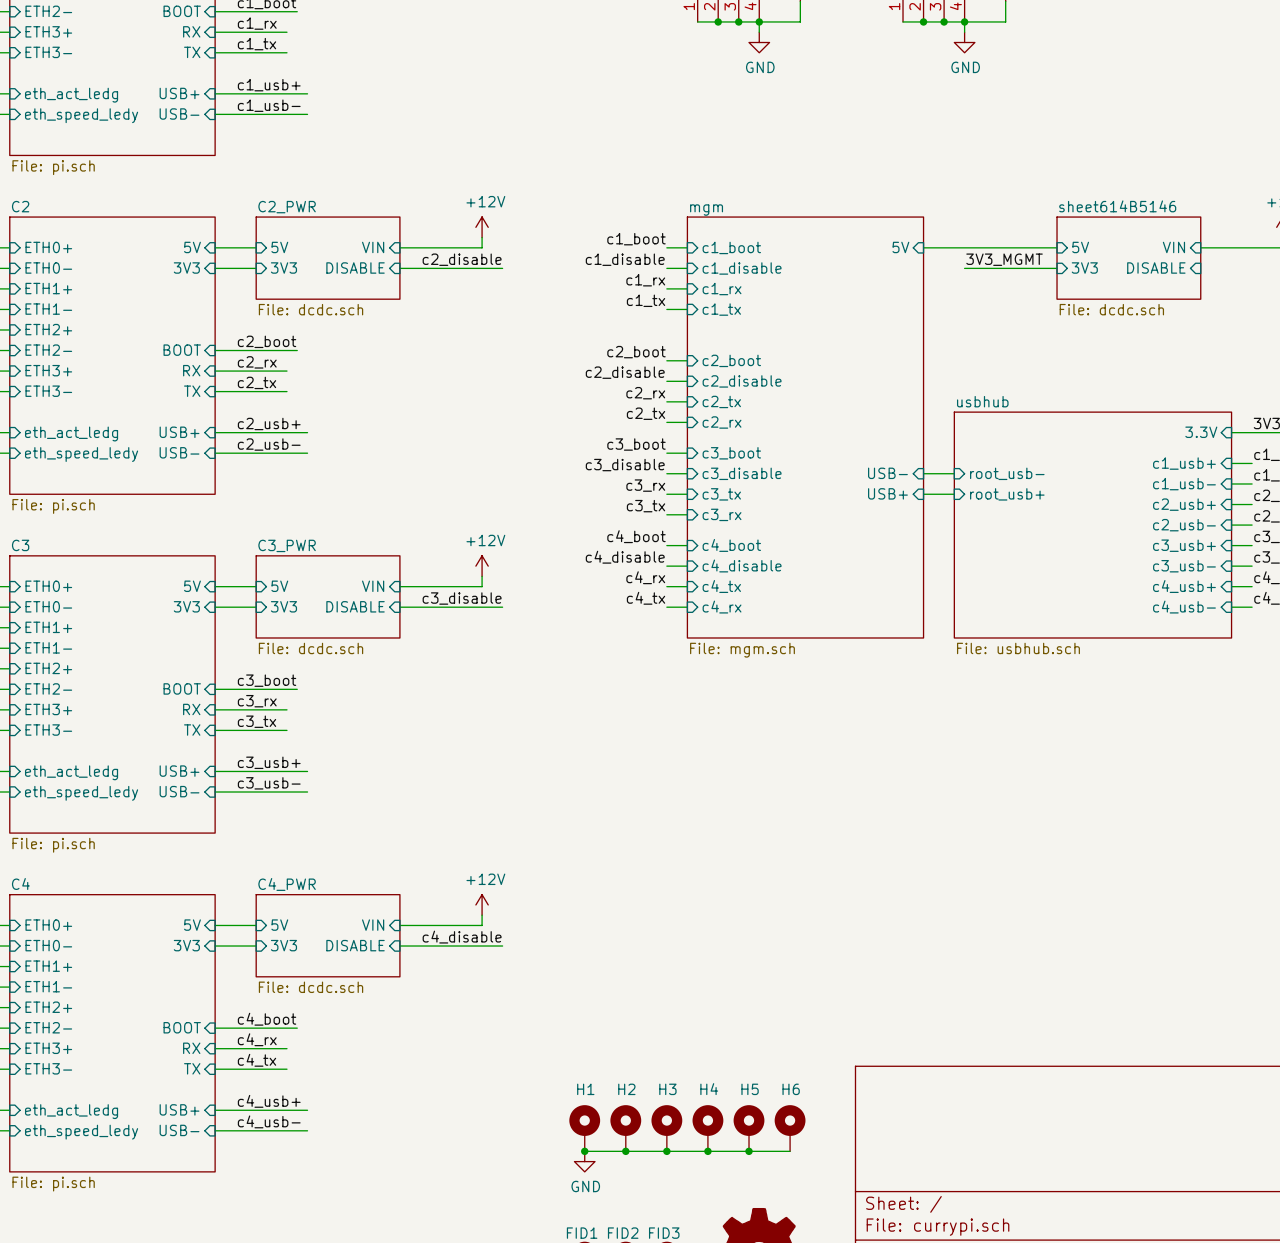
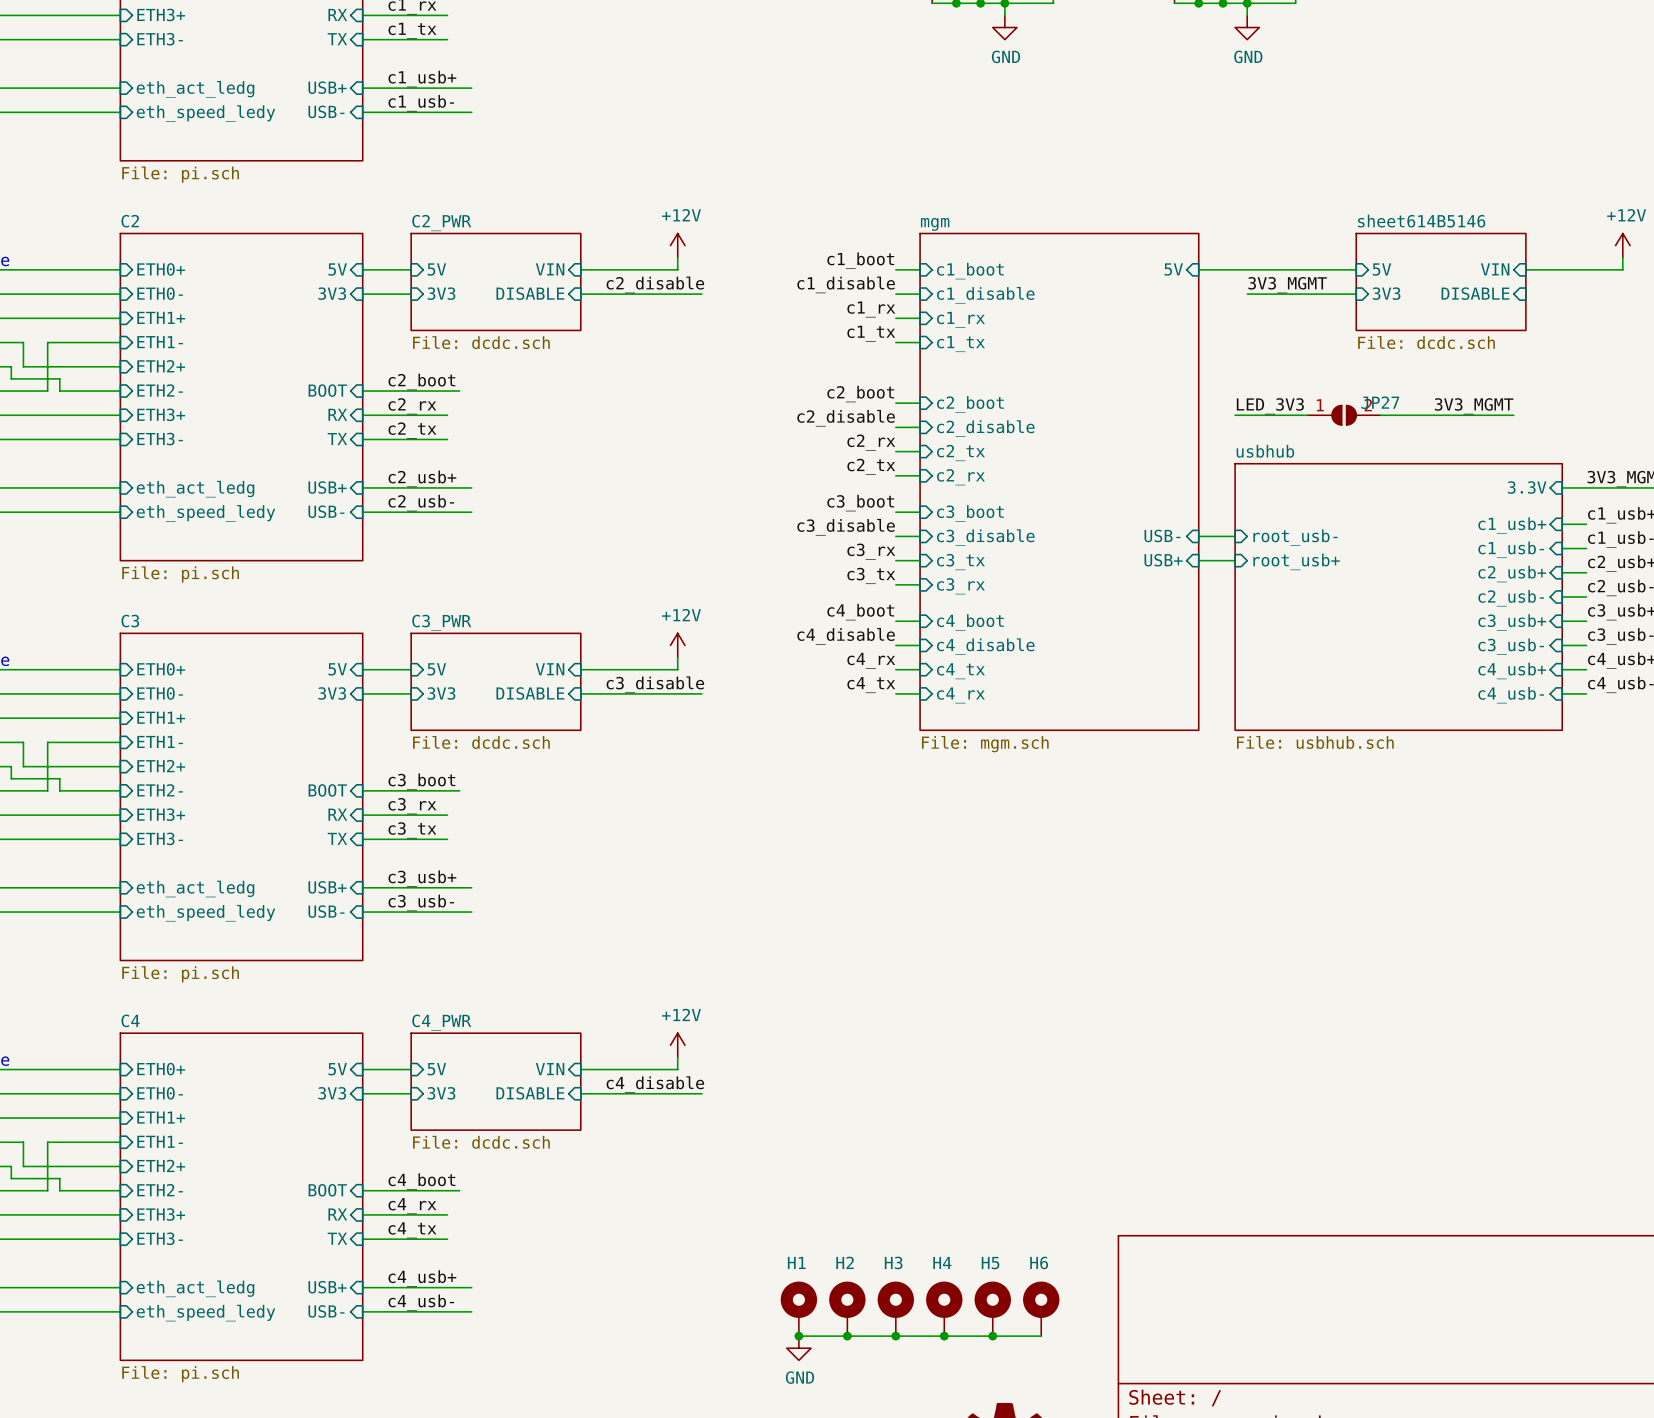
label: none -> LED_3V3 (1270, 406)
label: none -> 3V3_MGMT (1474, 406)
wire: none -> (1235, 415) (1307, 415)
JP27: none -> (1344, 415)
wire: none -> (1380, 415) (1513, 415)

